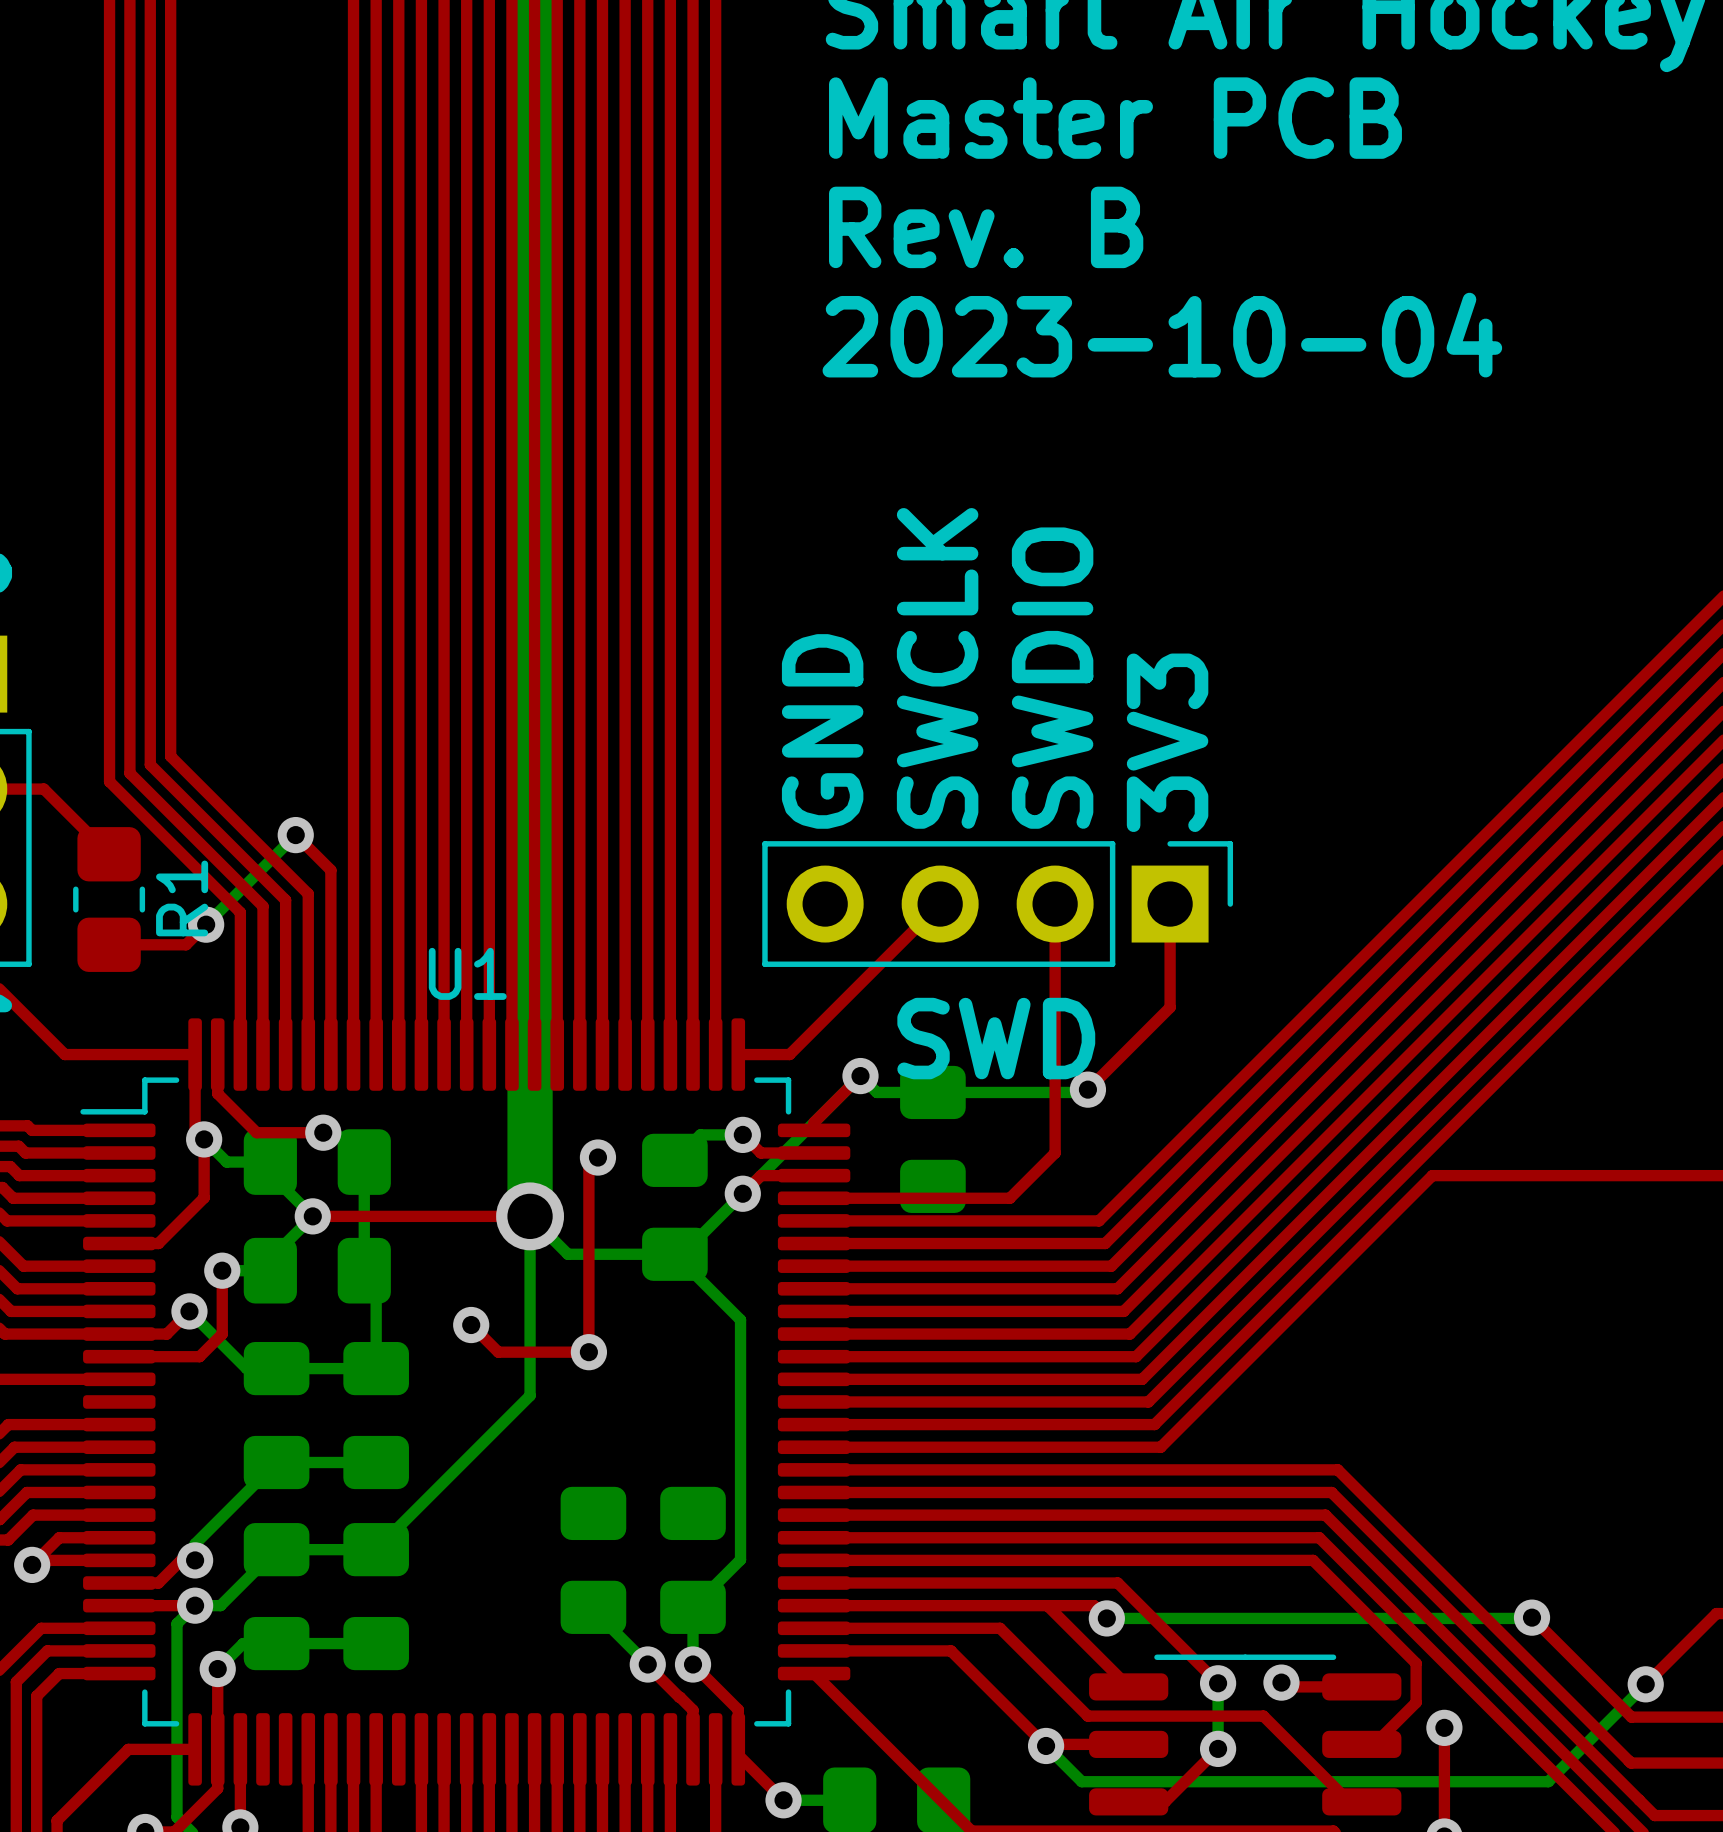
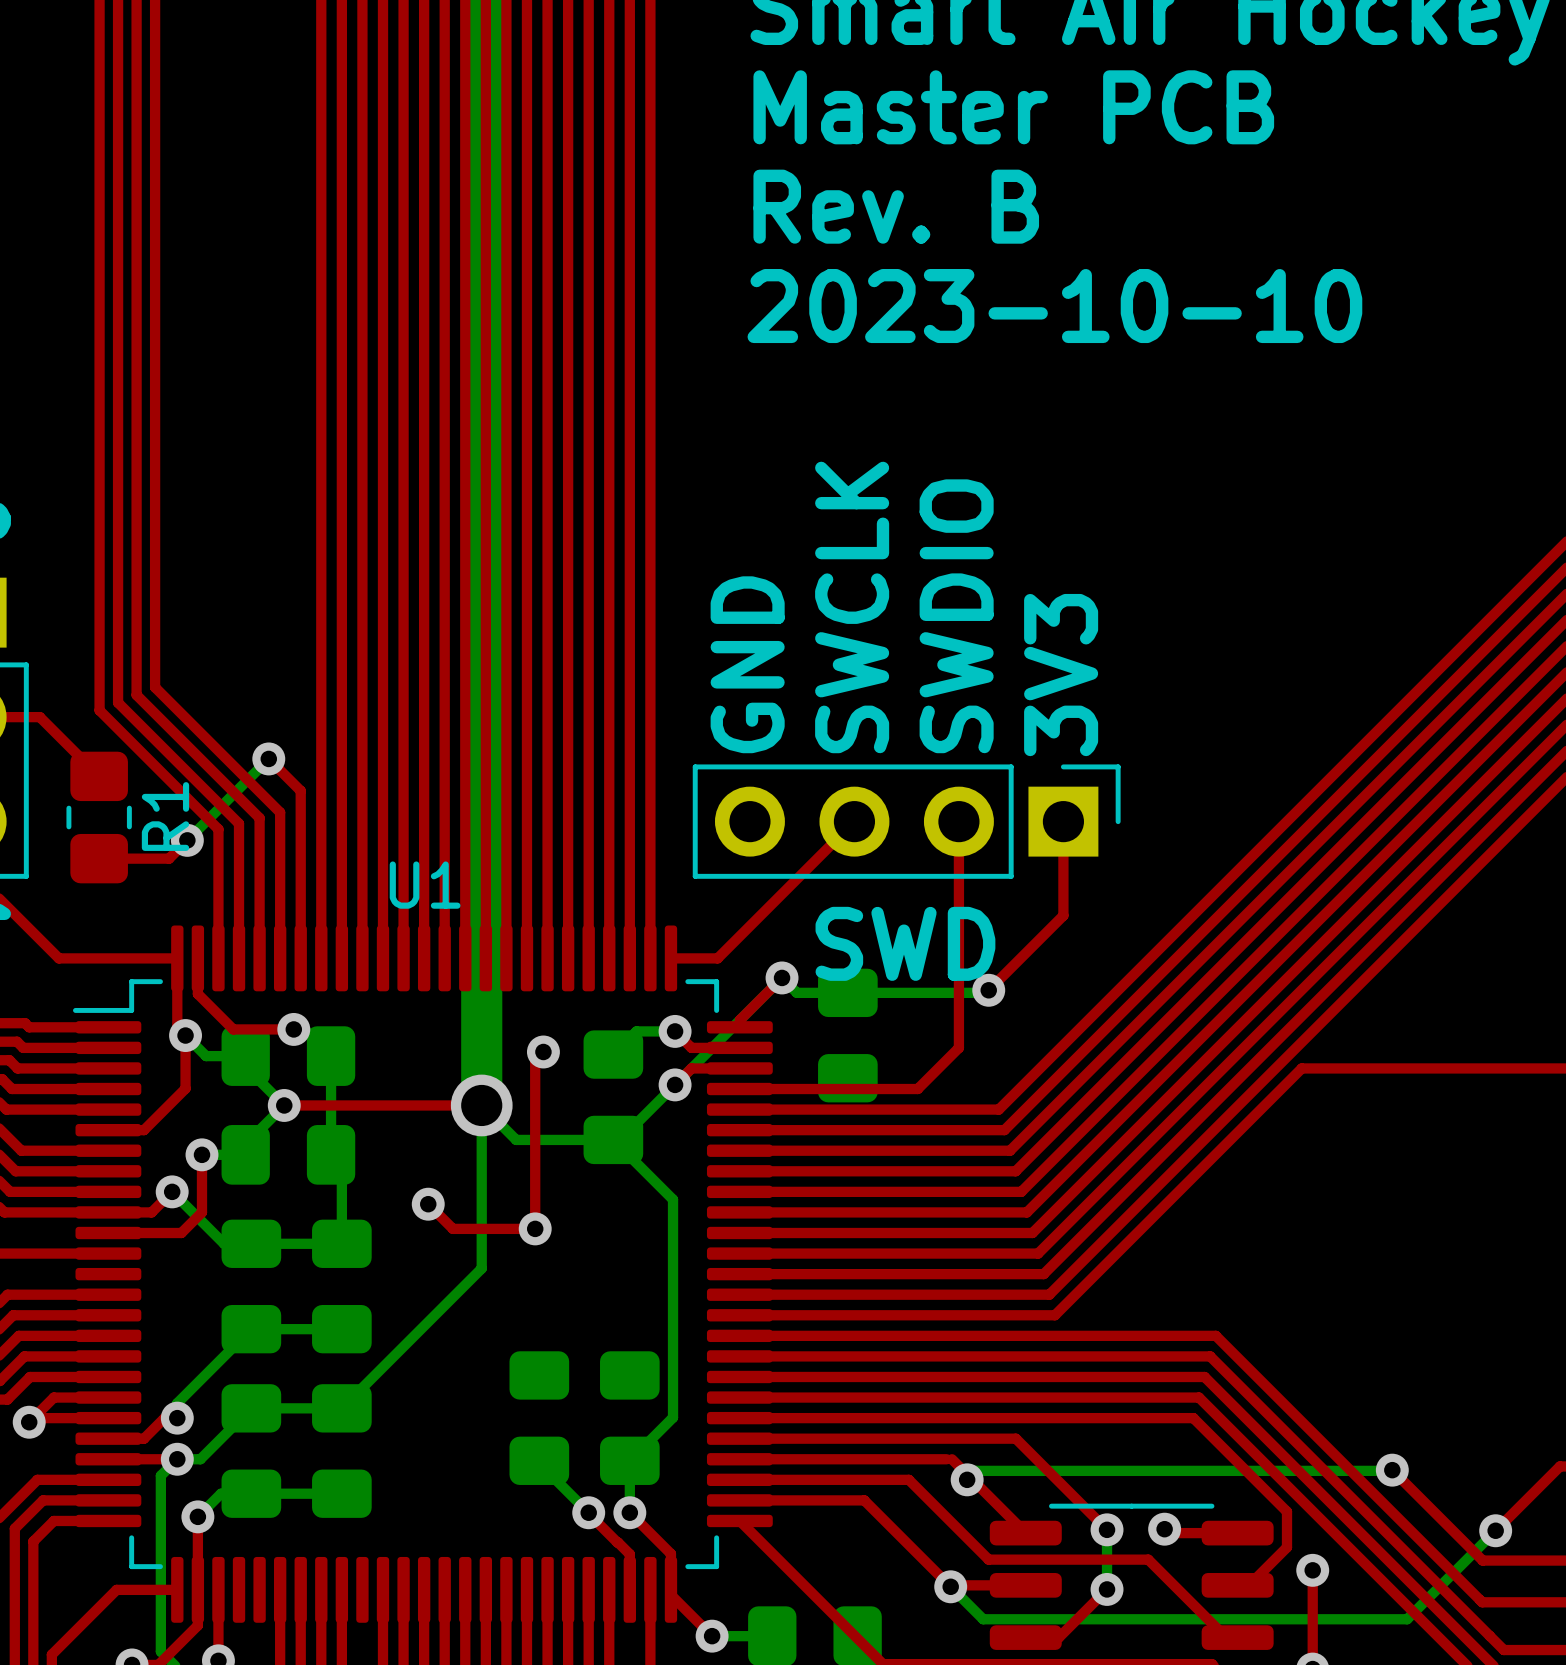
text: 2023-10-04 (1162, 335) -> 2023-10-10 (1054, 306)
top track: (1041, 1605) (1094, 1605) (1106, 1618) -> none
bottom track: none -> (1005, 1470) (976, 1470) (967, 1479)
via position: (1106, 1618) -> (967, 1479)

